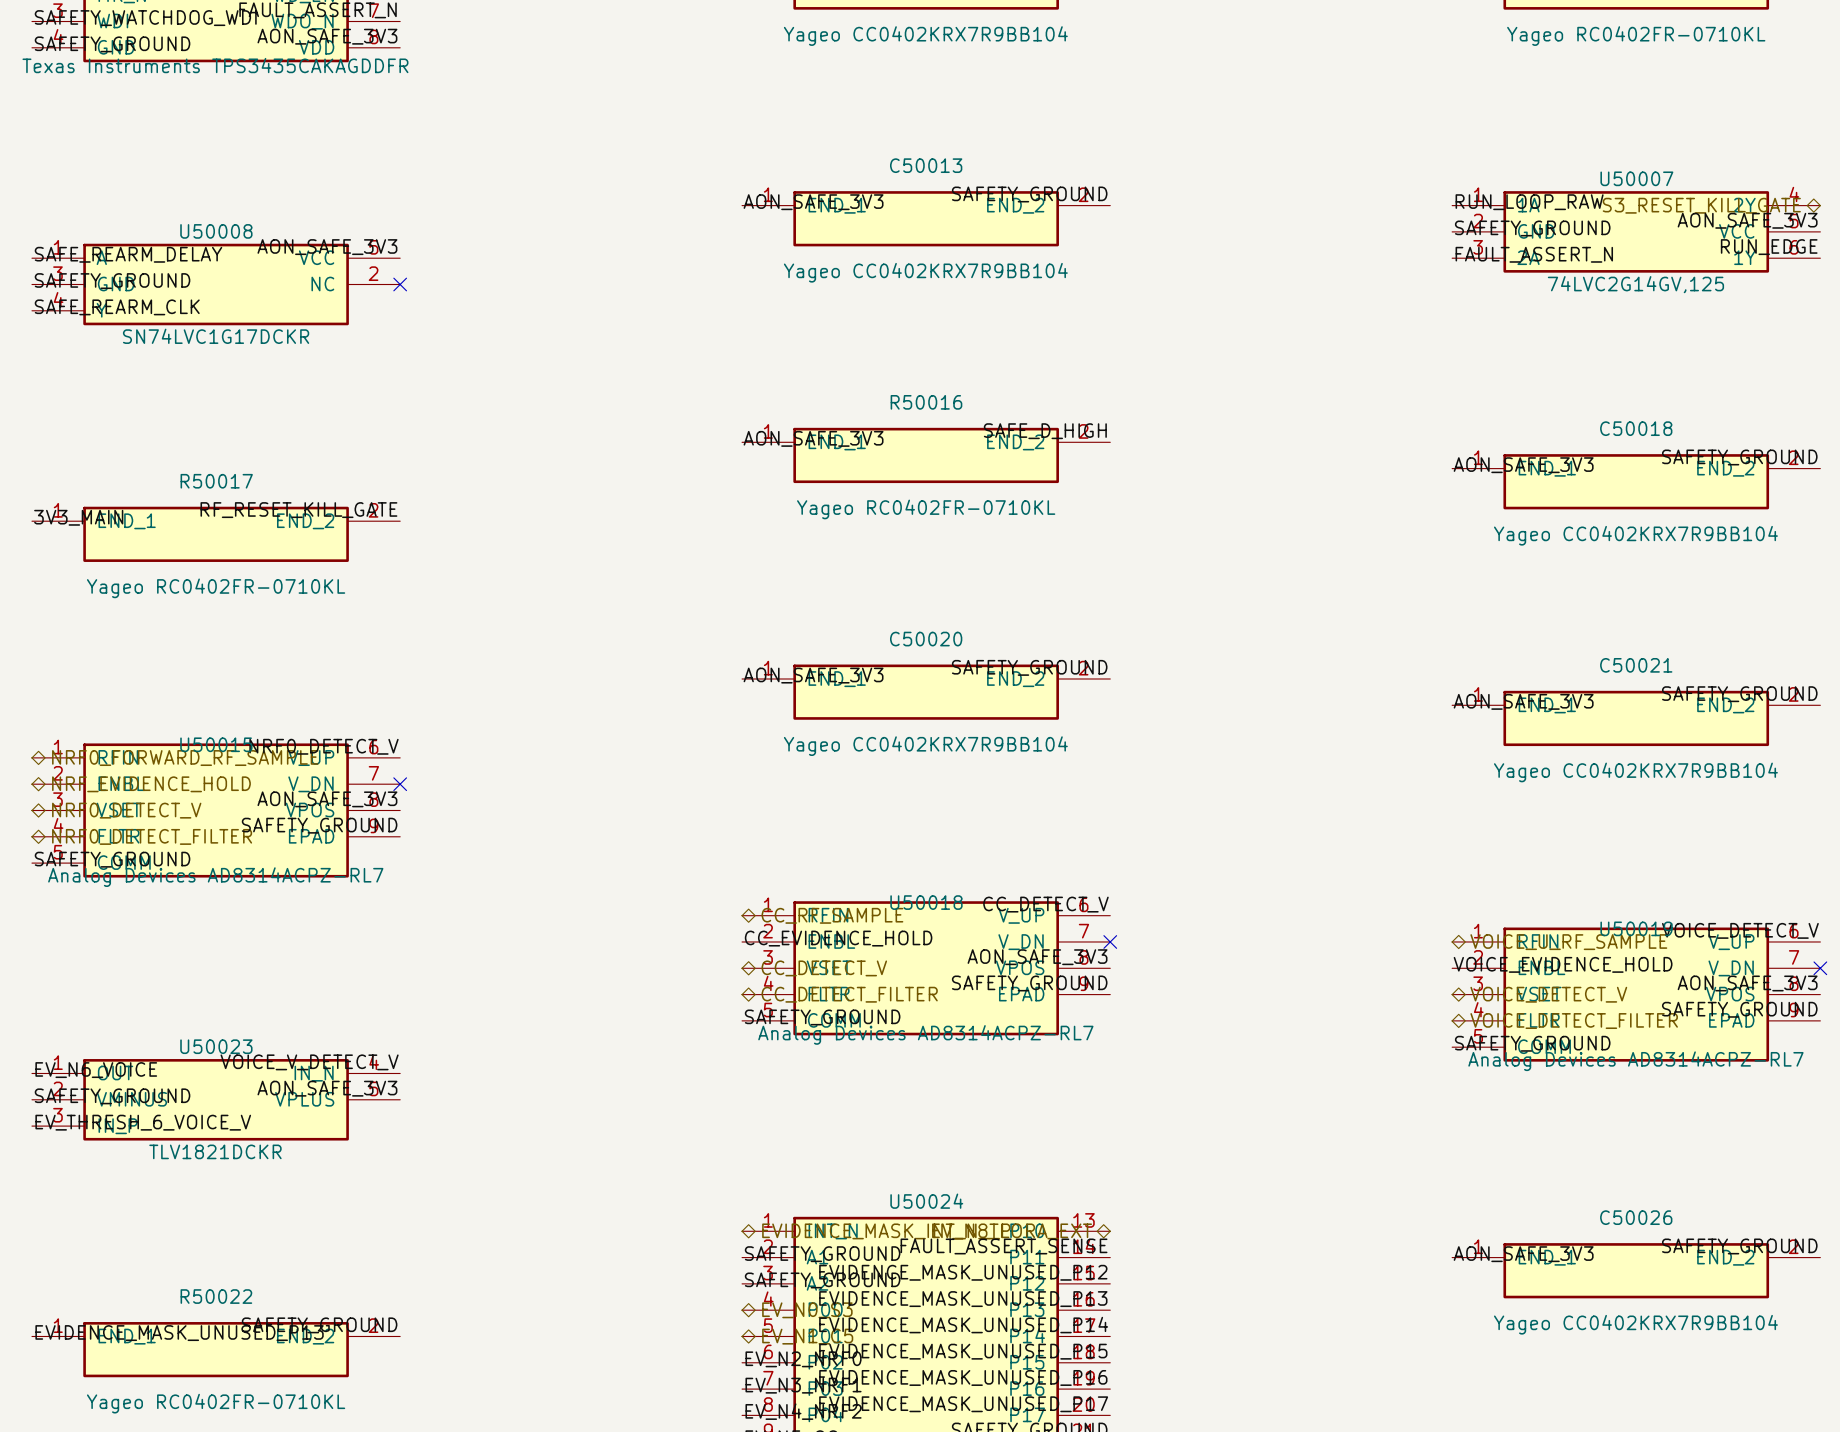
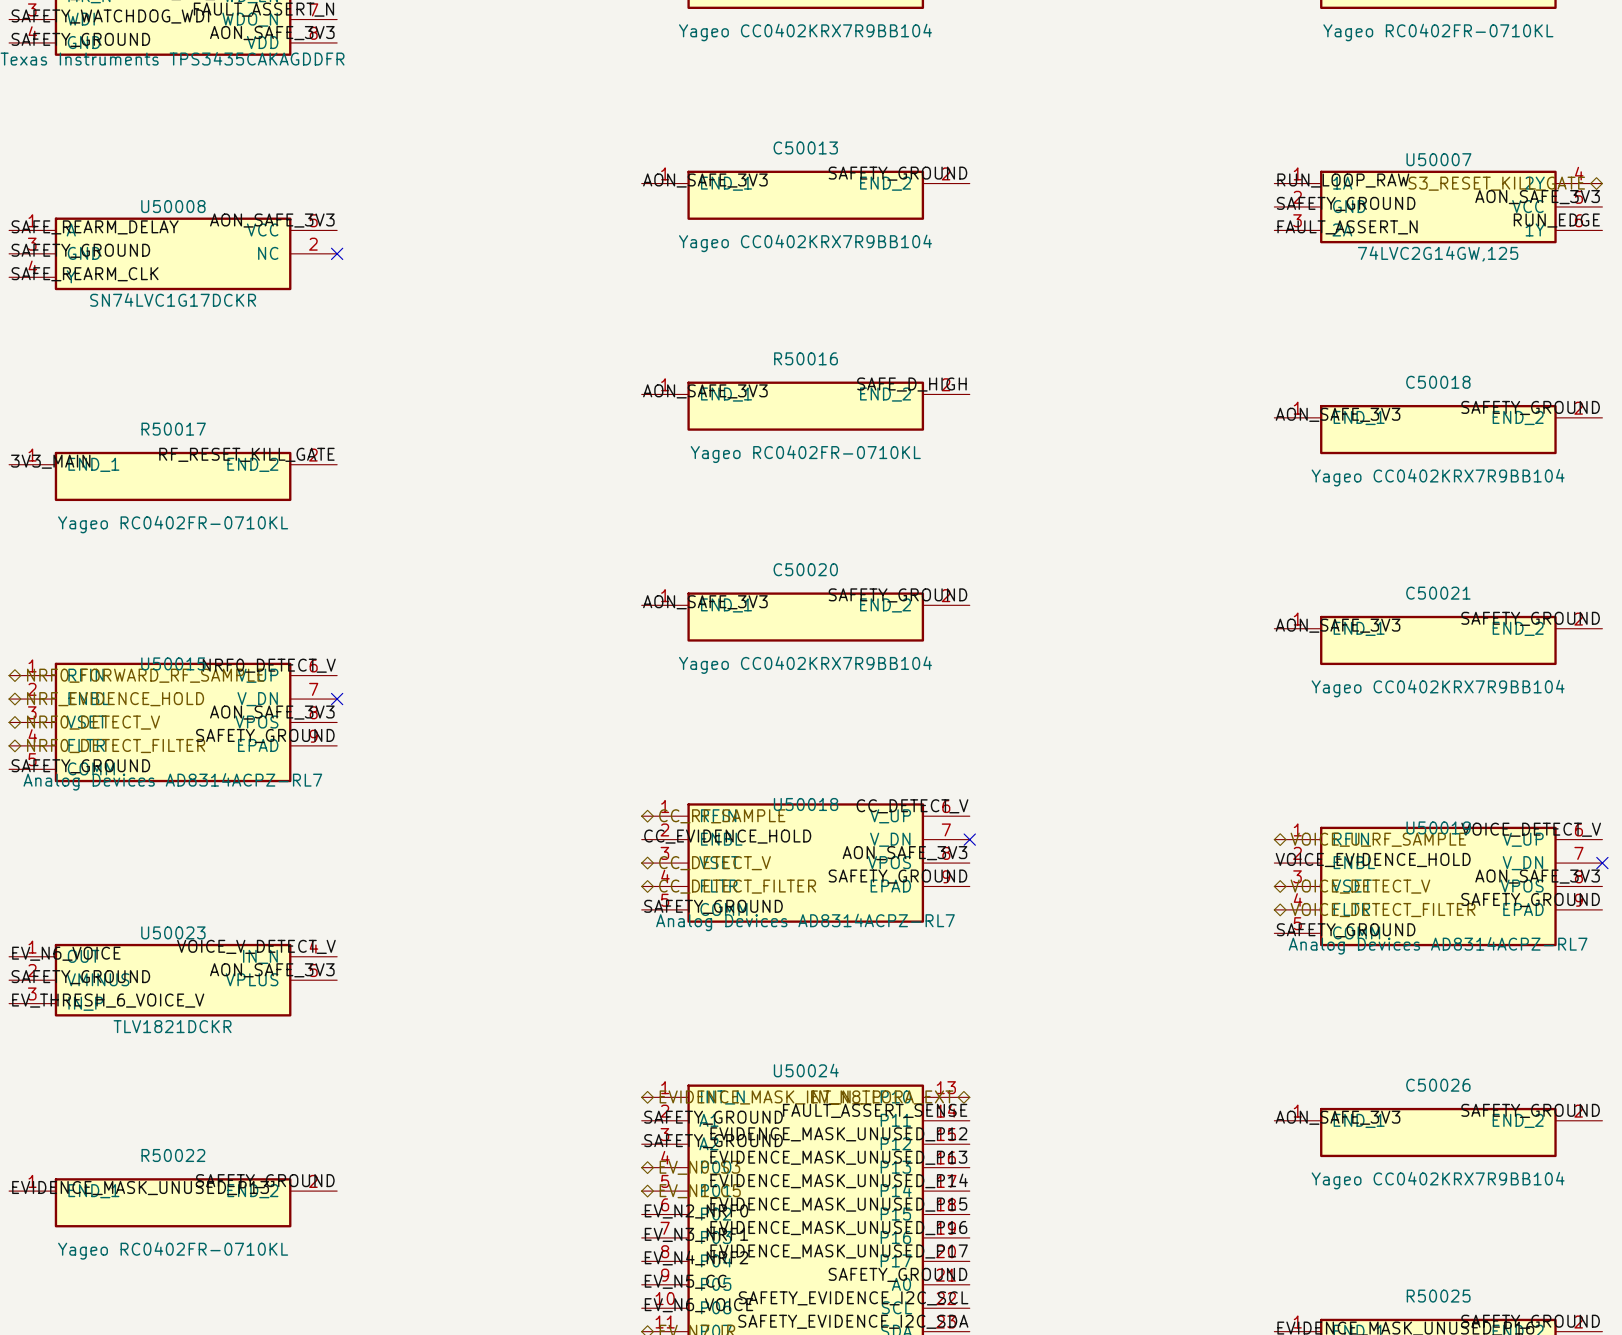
U50007 value: 74LVC2G14GV,125 (1635, 284) -> 74LVC2G14GW,125 (1438, 253)

